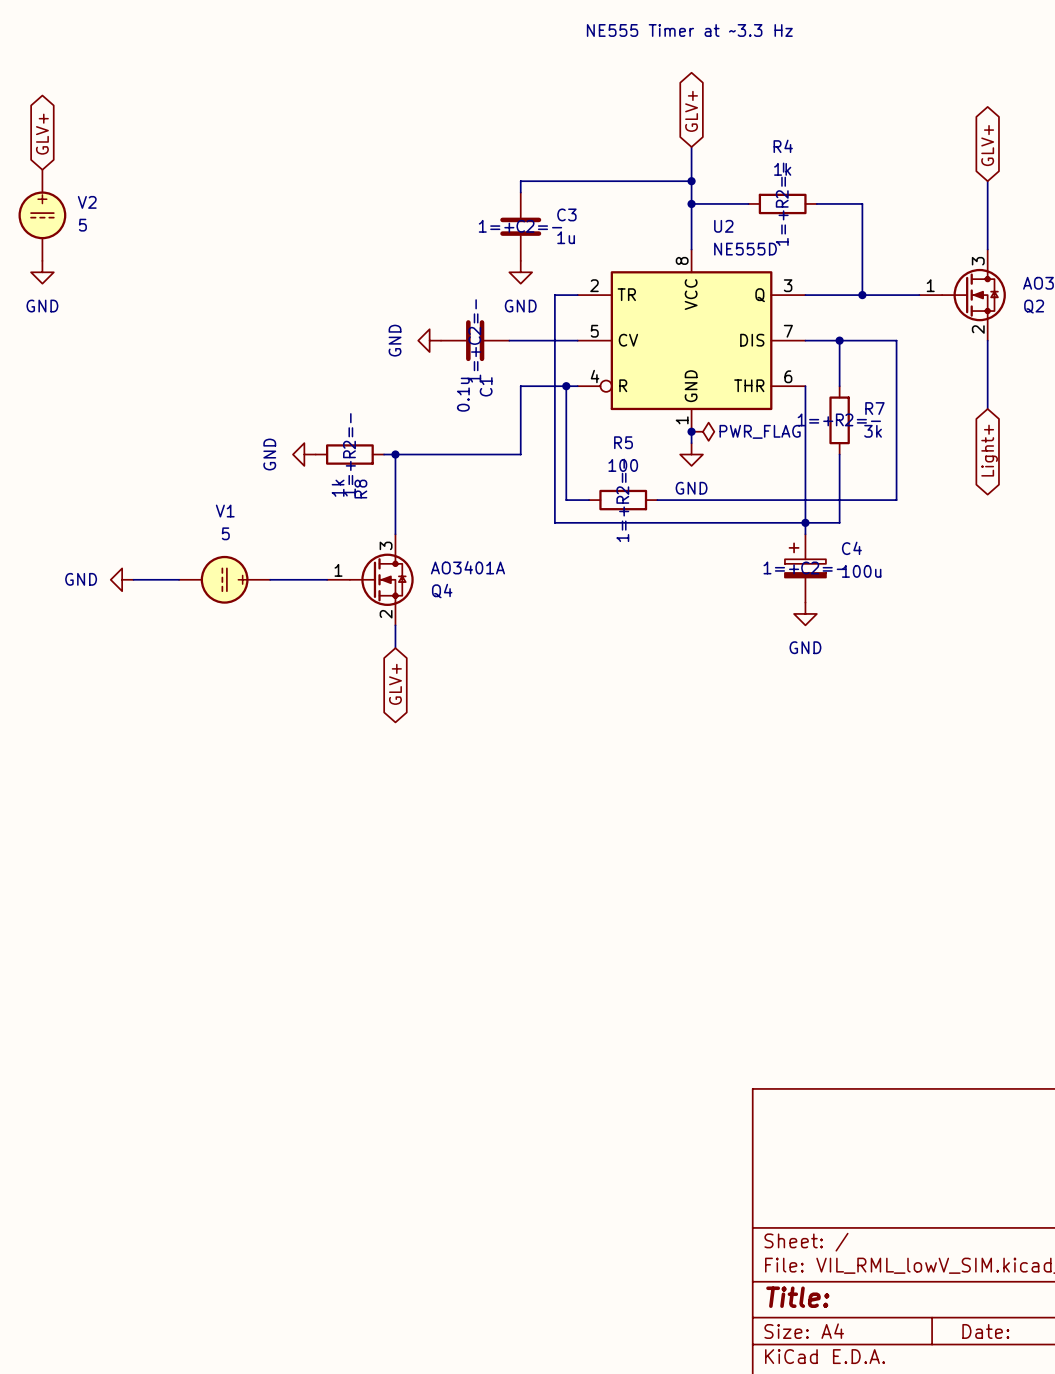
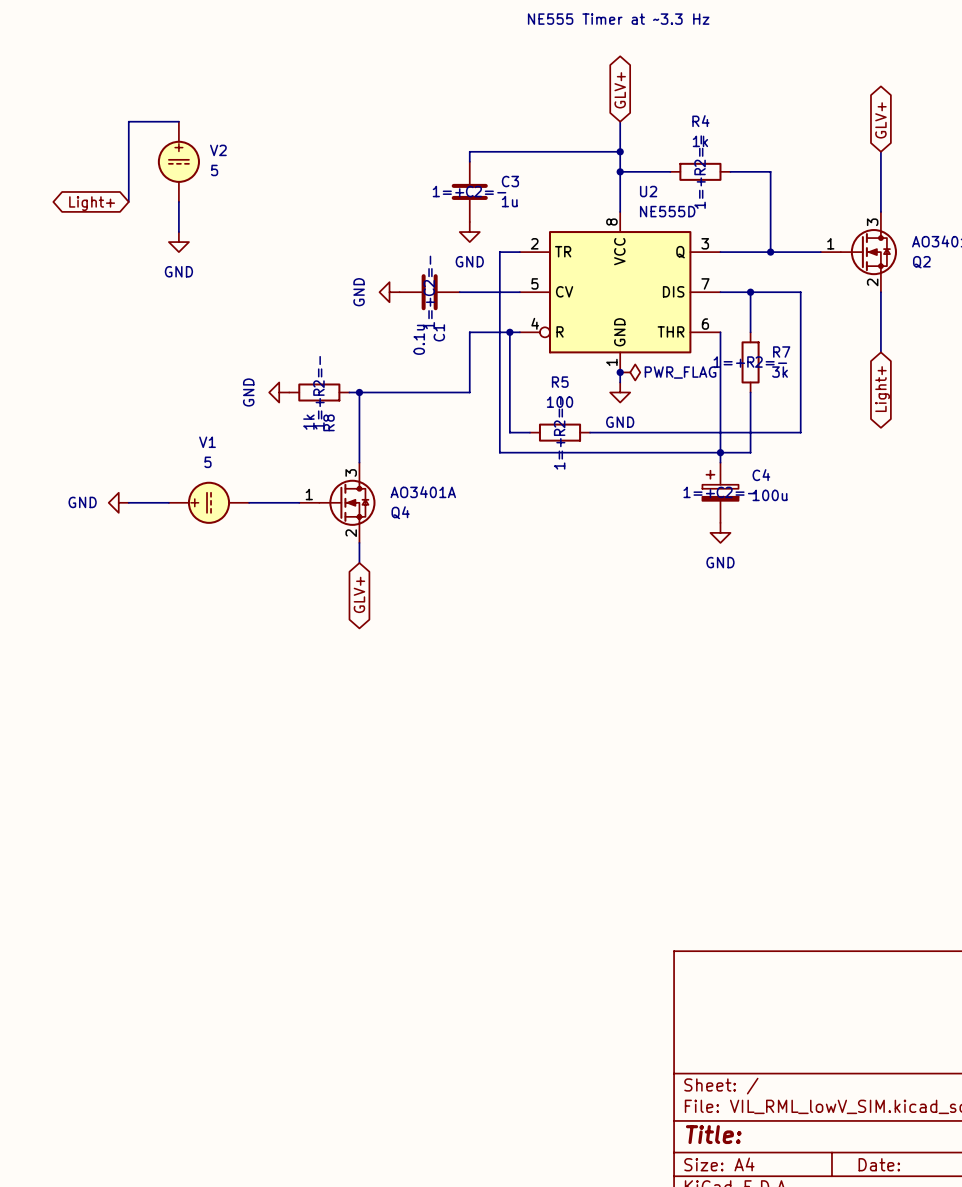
global label: GLV+ (42, 134) -> none
wire: none -> (178, 121) (128, 121) (128, 201)
V2 position: (42, 215) -> (178, 161)
wire: none -> (178, 201) (178, 232)
global label: none -> Light+ (92, 203)
power symbol position: GND (42, 272) -> GND (178, 242)
V1 rotation: 0° (224, 579) -> 180° (209, 502)

